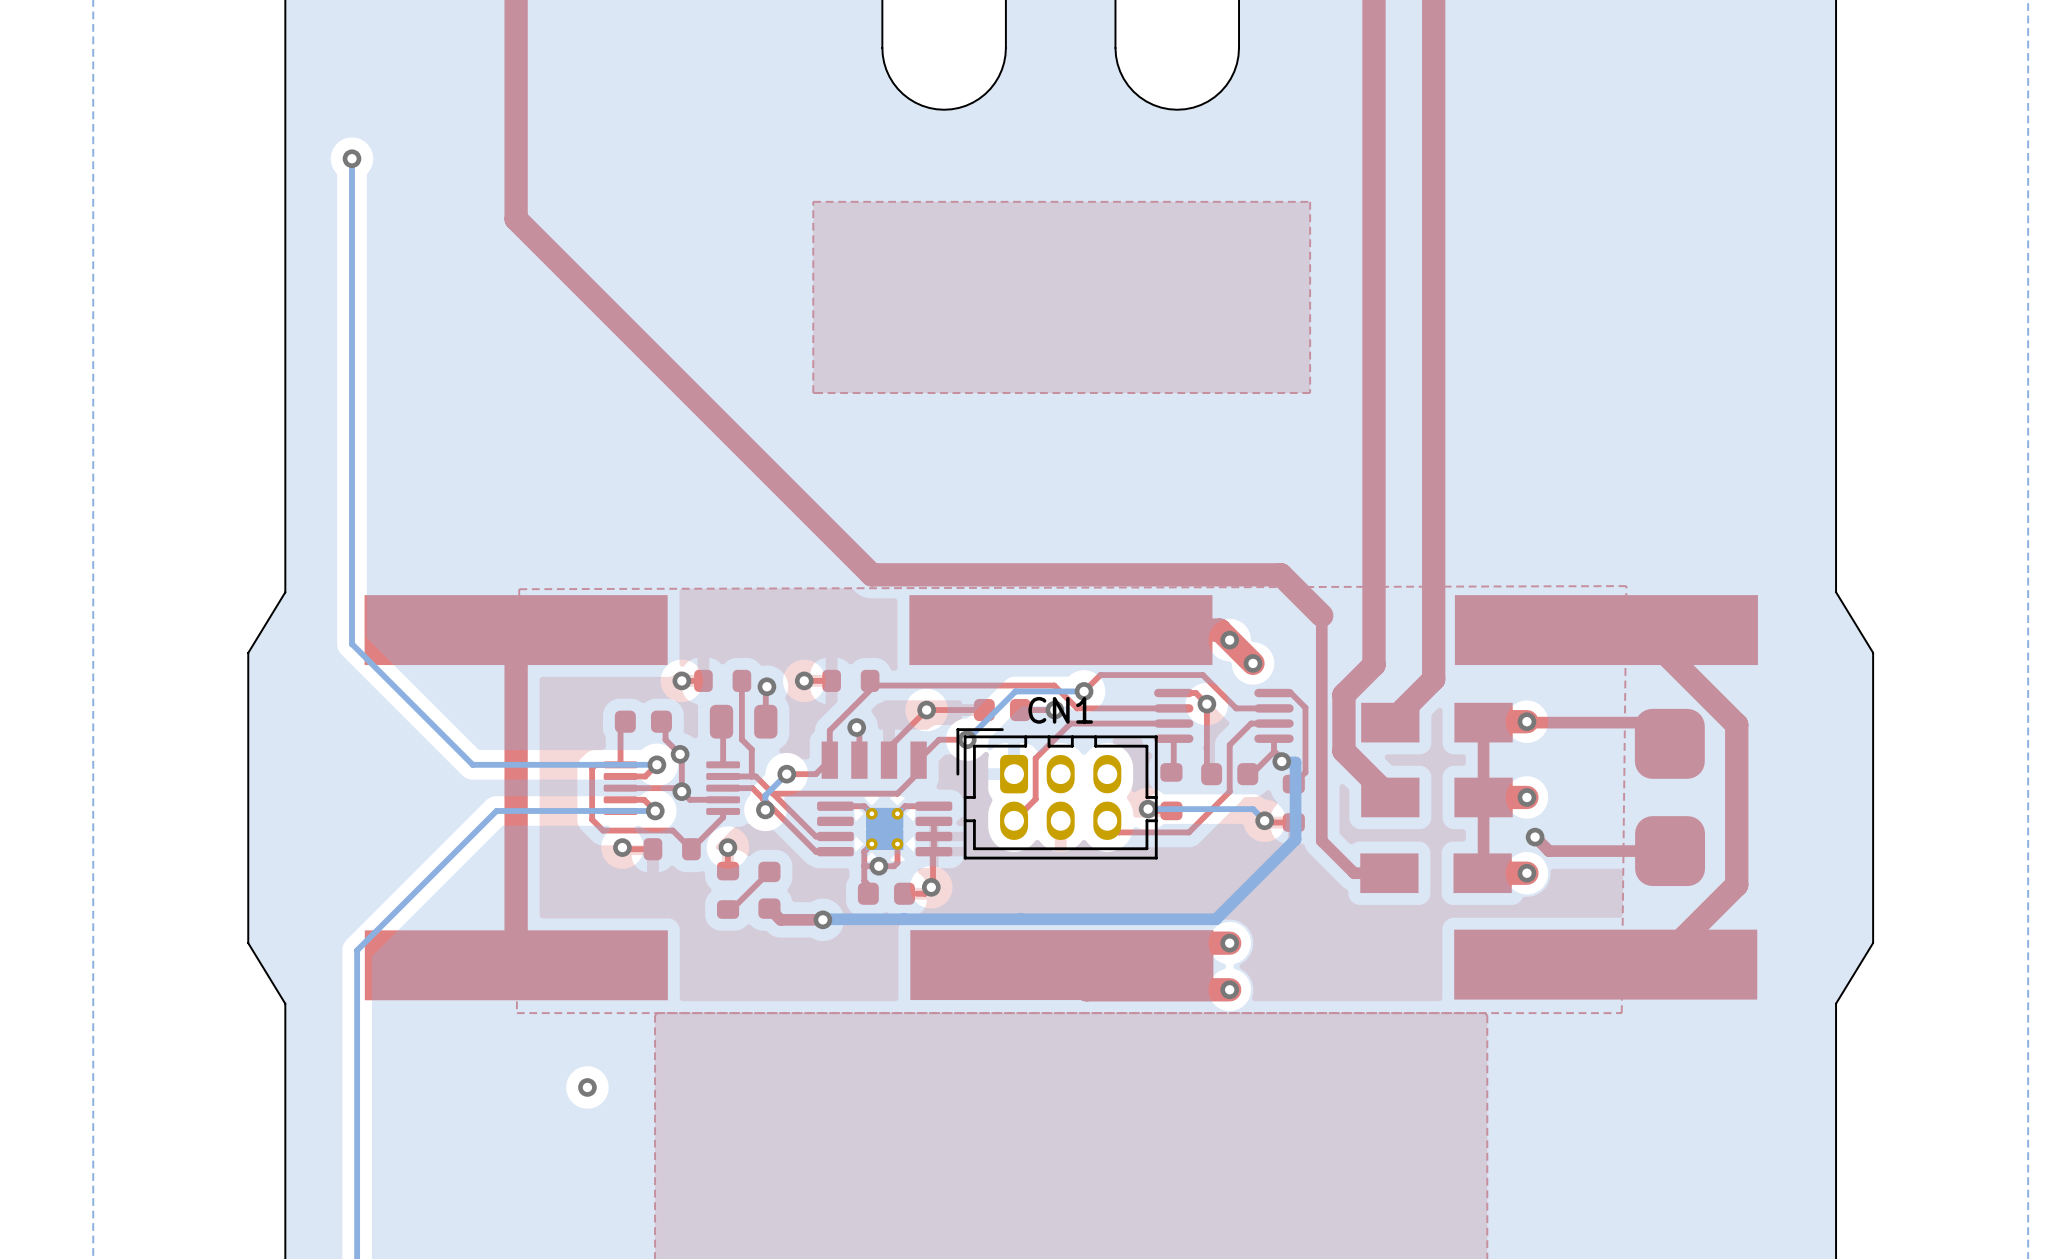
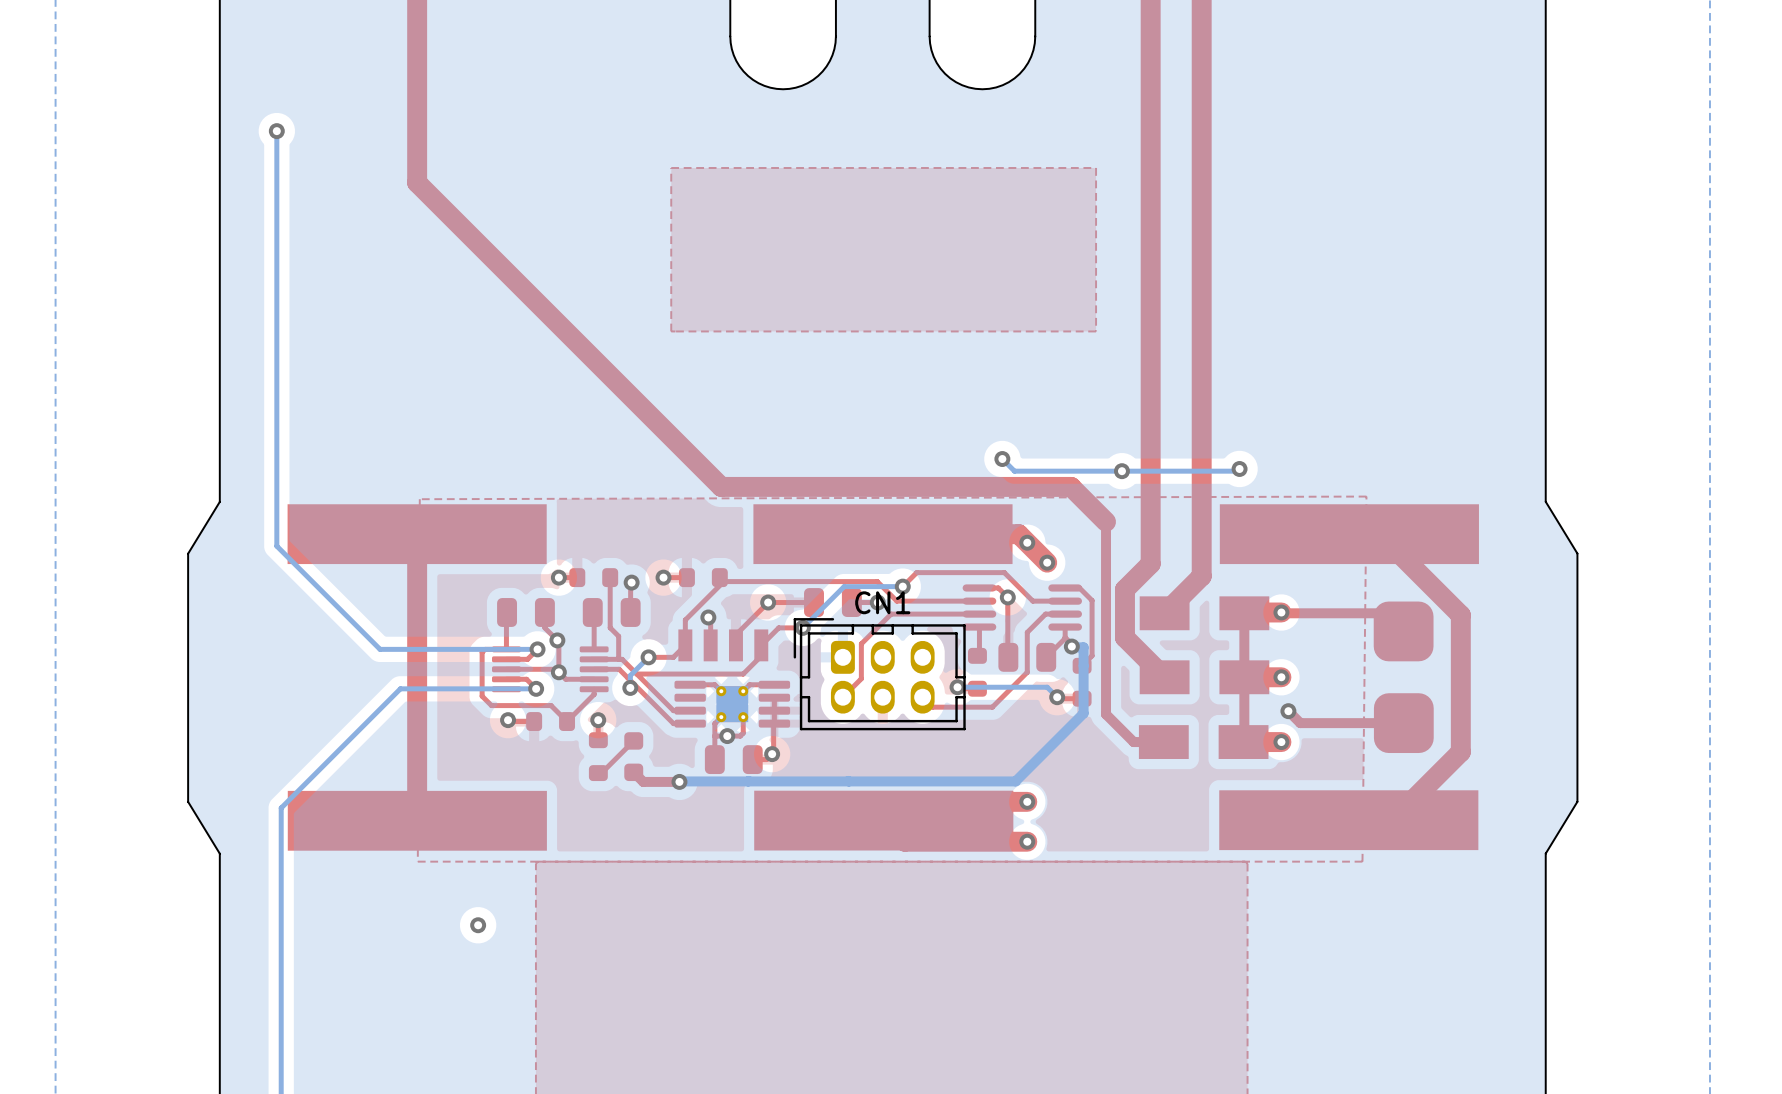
bottom track: none -> (1002, 459) (1014, 471) (1237, 471) (1239, 468)
via: none -> (1002, 459)
via: none -> (1239, 468)
via: none -> (1121, 471)
part footprint: [973, 698, 1031, 722] -> [804, 588, 862, 617]
part footprint: [614, 710, 672, 733] -> [497, 598, 555, 627]
part footprint: [1201, 763, 1259, 786] -> [998, 642, 1057, 672]
part footprint: [857, 882, 915, 905] -> [704, 745, 763, 775]

